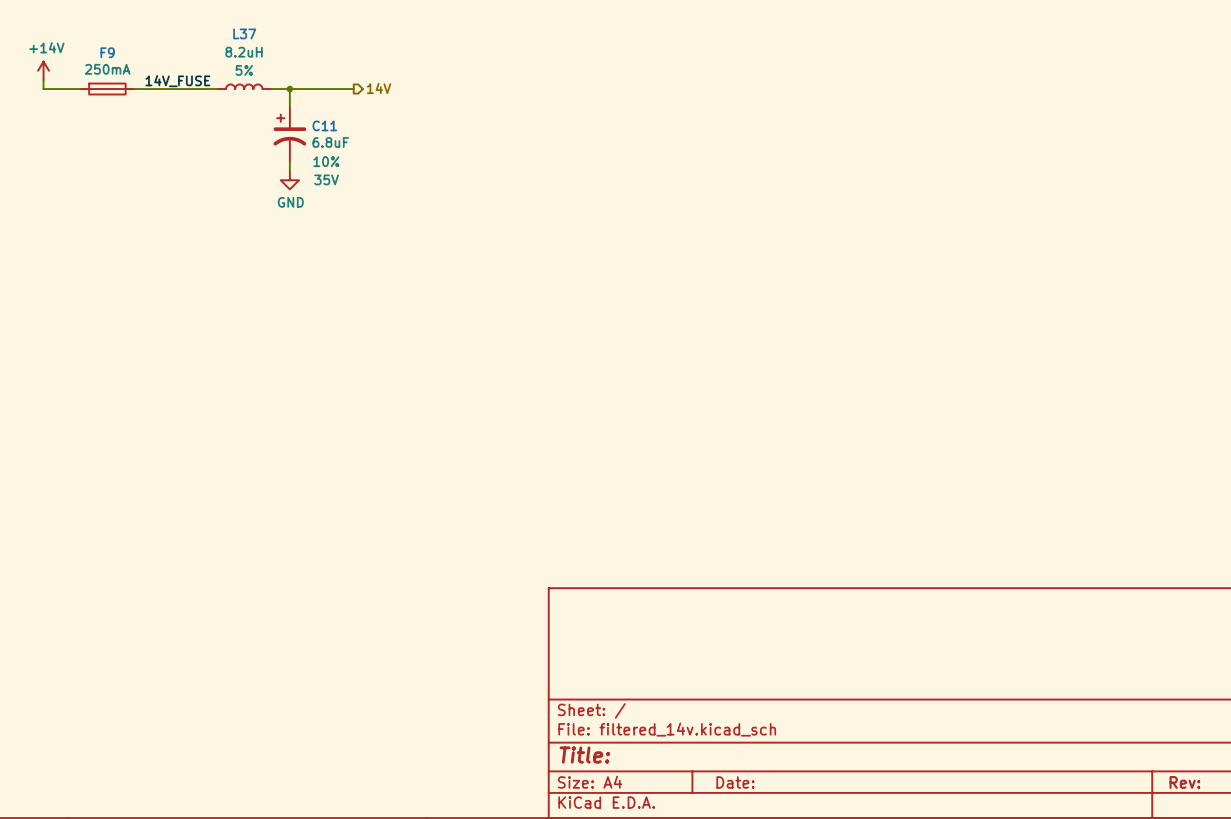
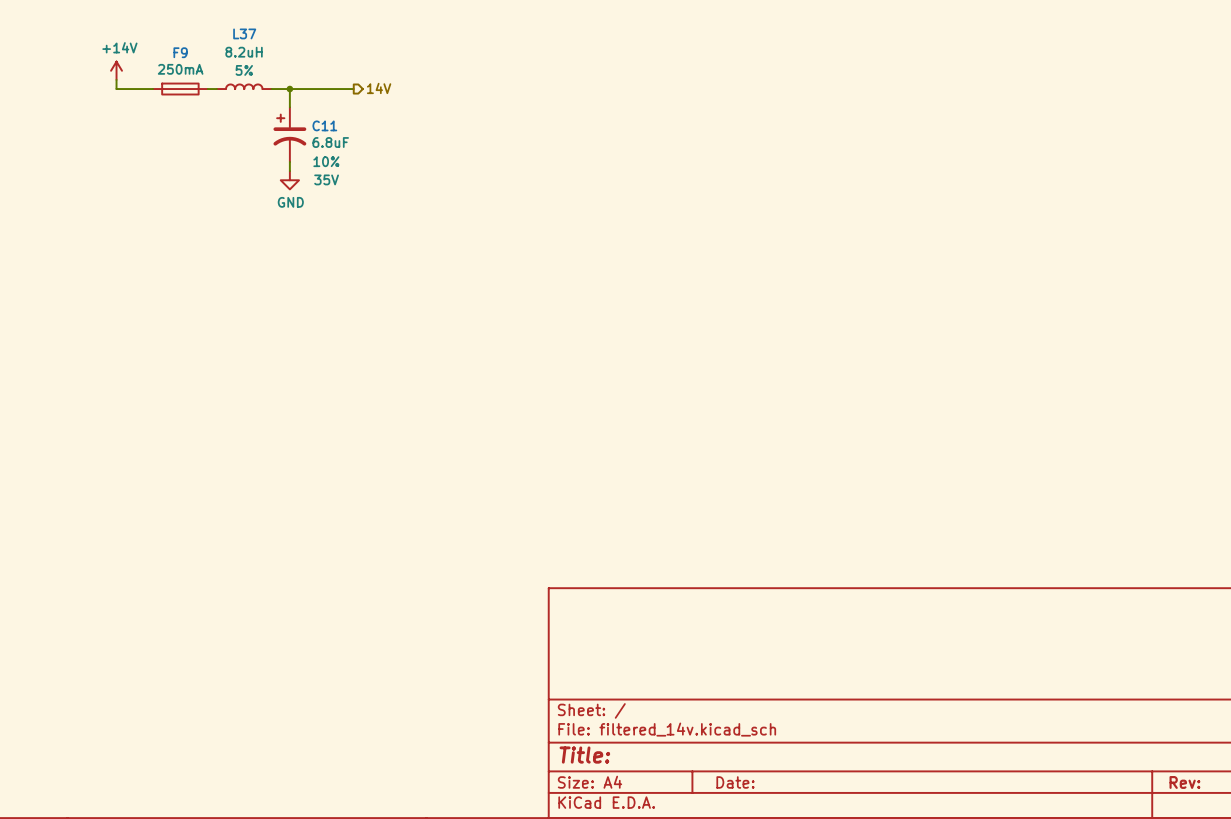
power symbol position: +14V (43, 70) -> +14V (116, 70)
wire: (43, 79) (43, 89) (80, 89) -> none
label: 14V_FUSE (177, 81) -> none
F9 position: (107, 89) -> (180, 89)

